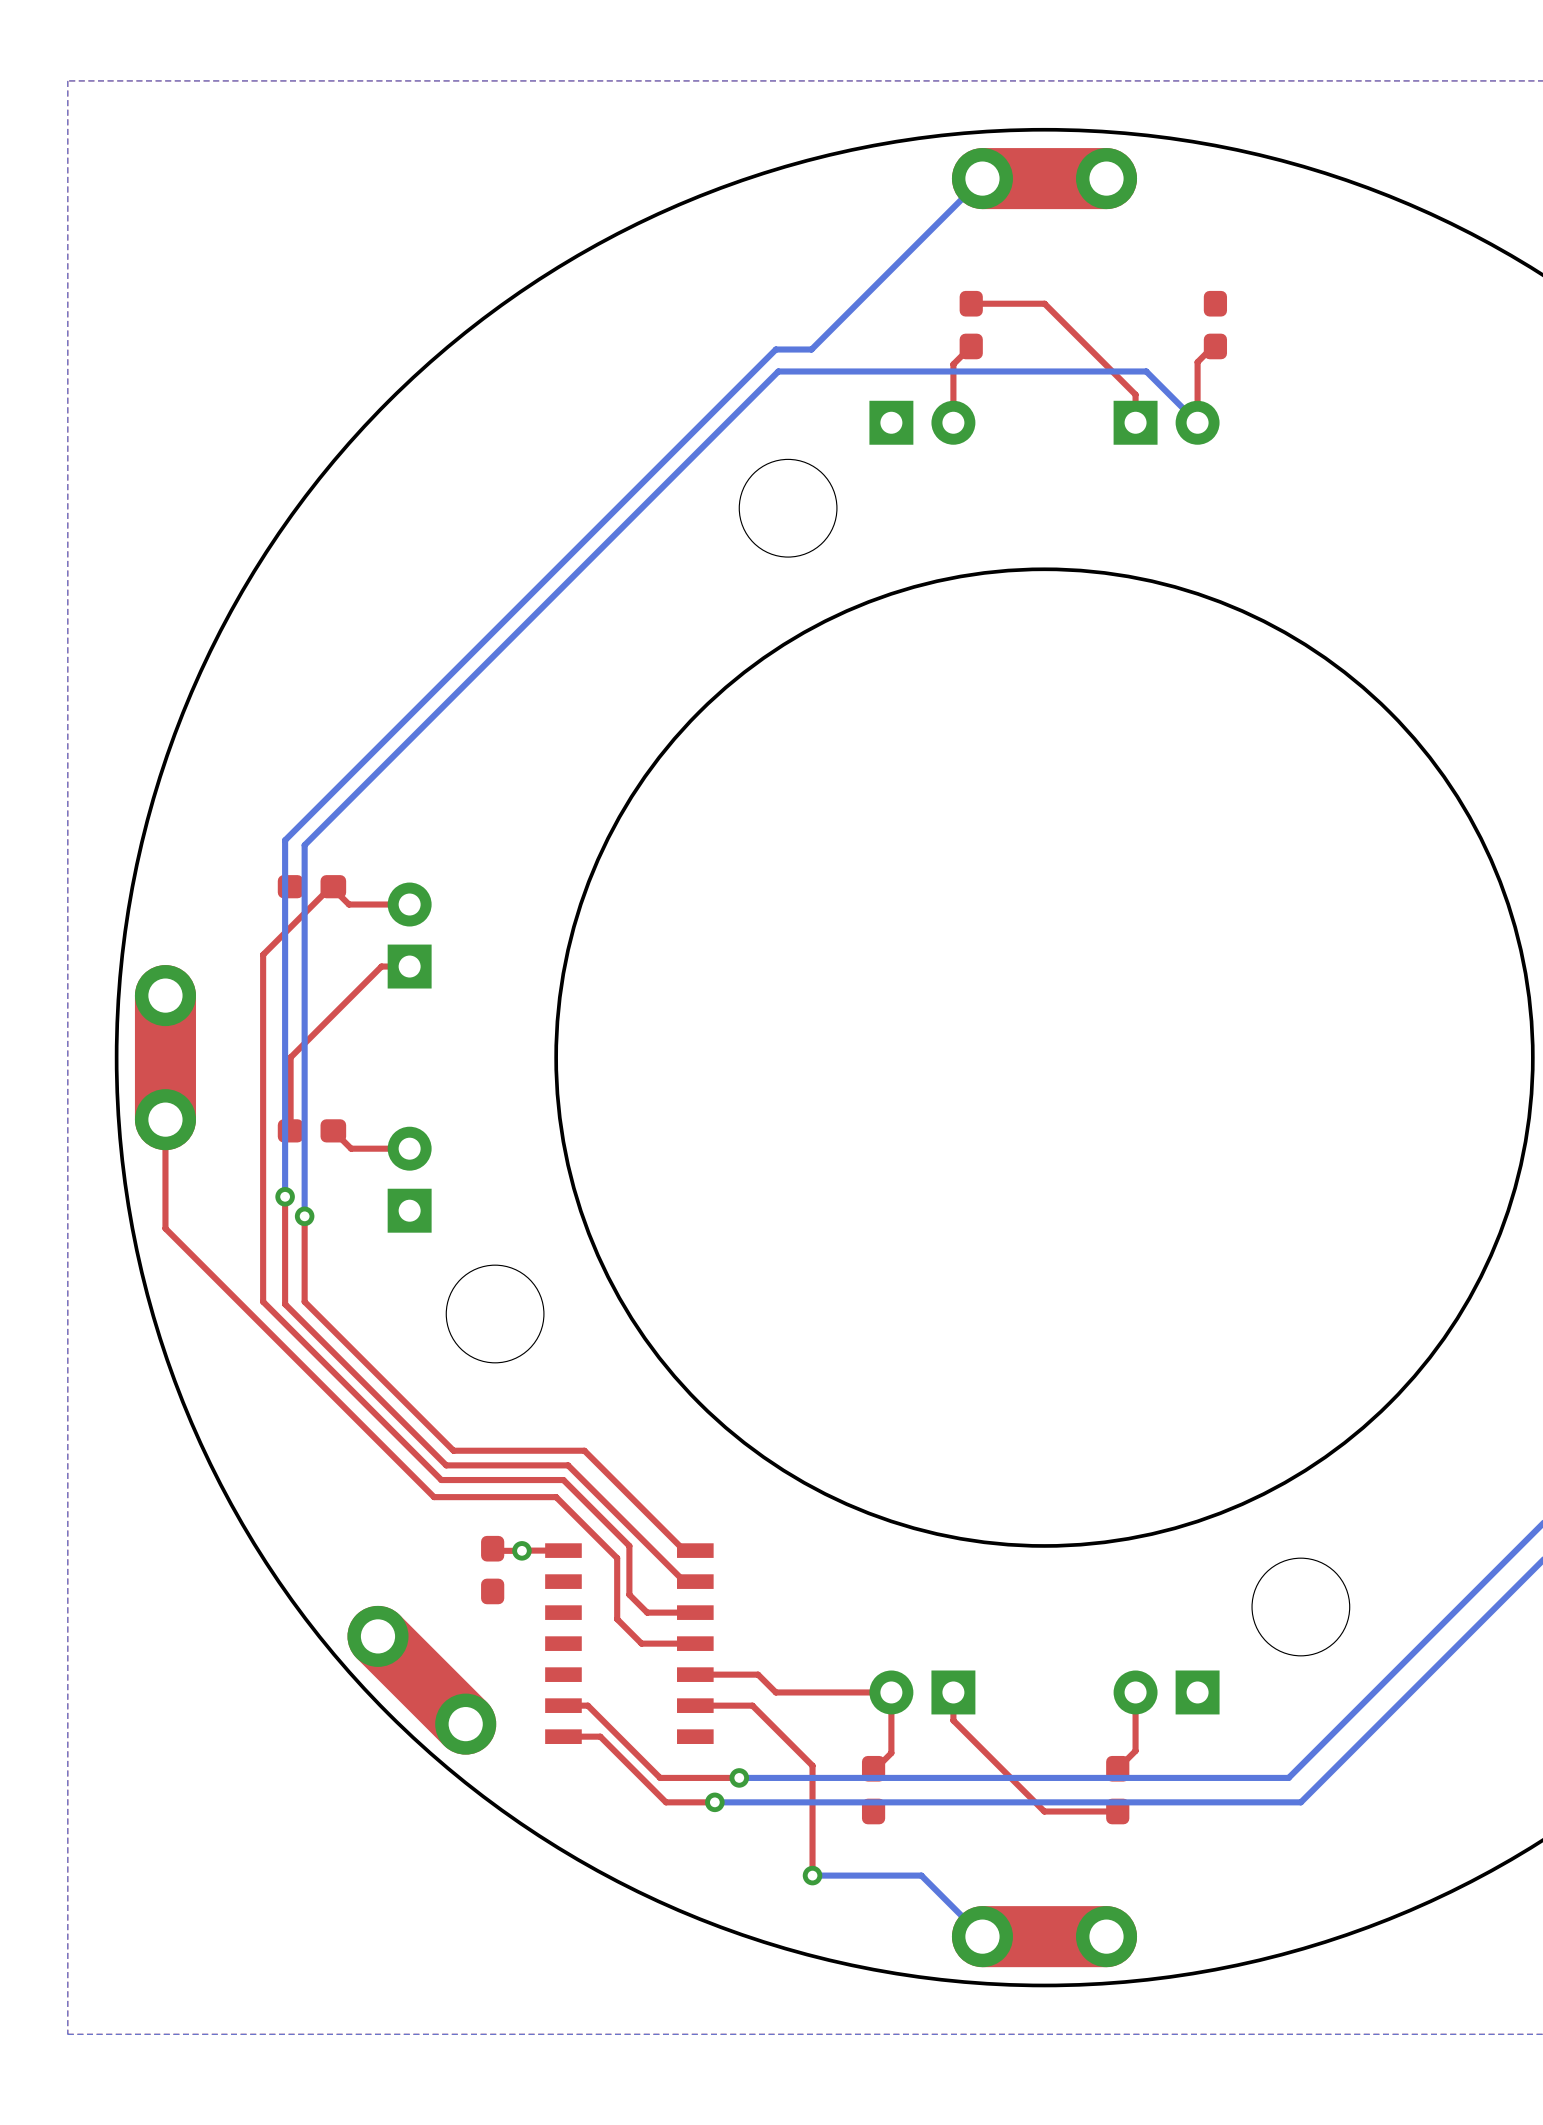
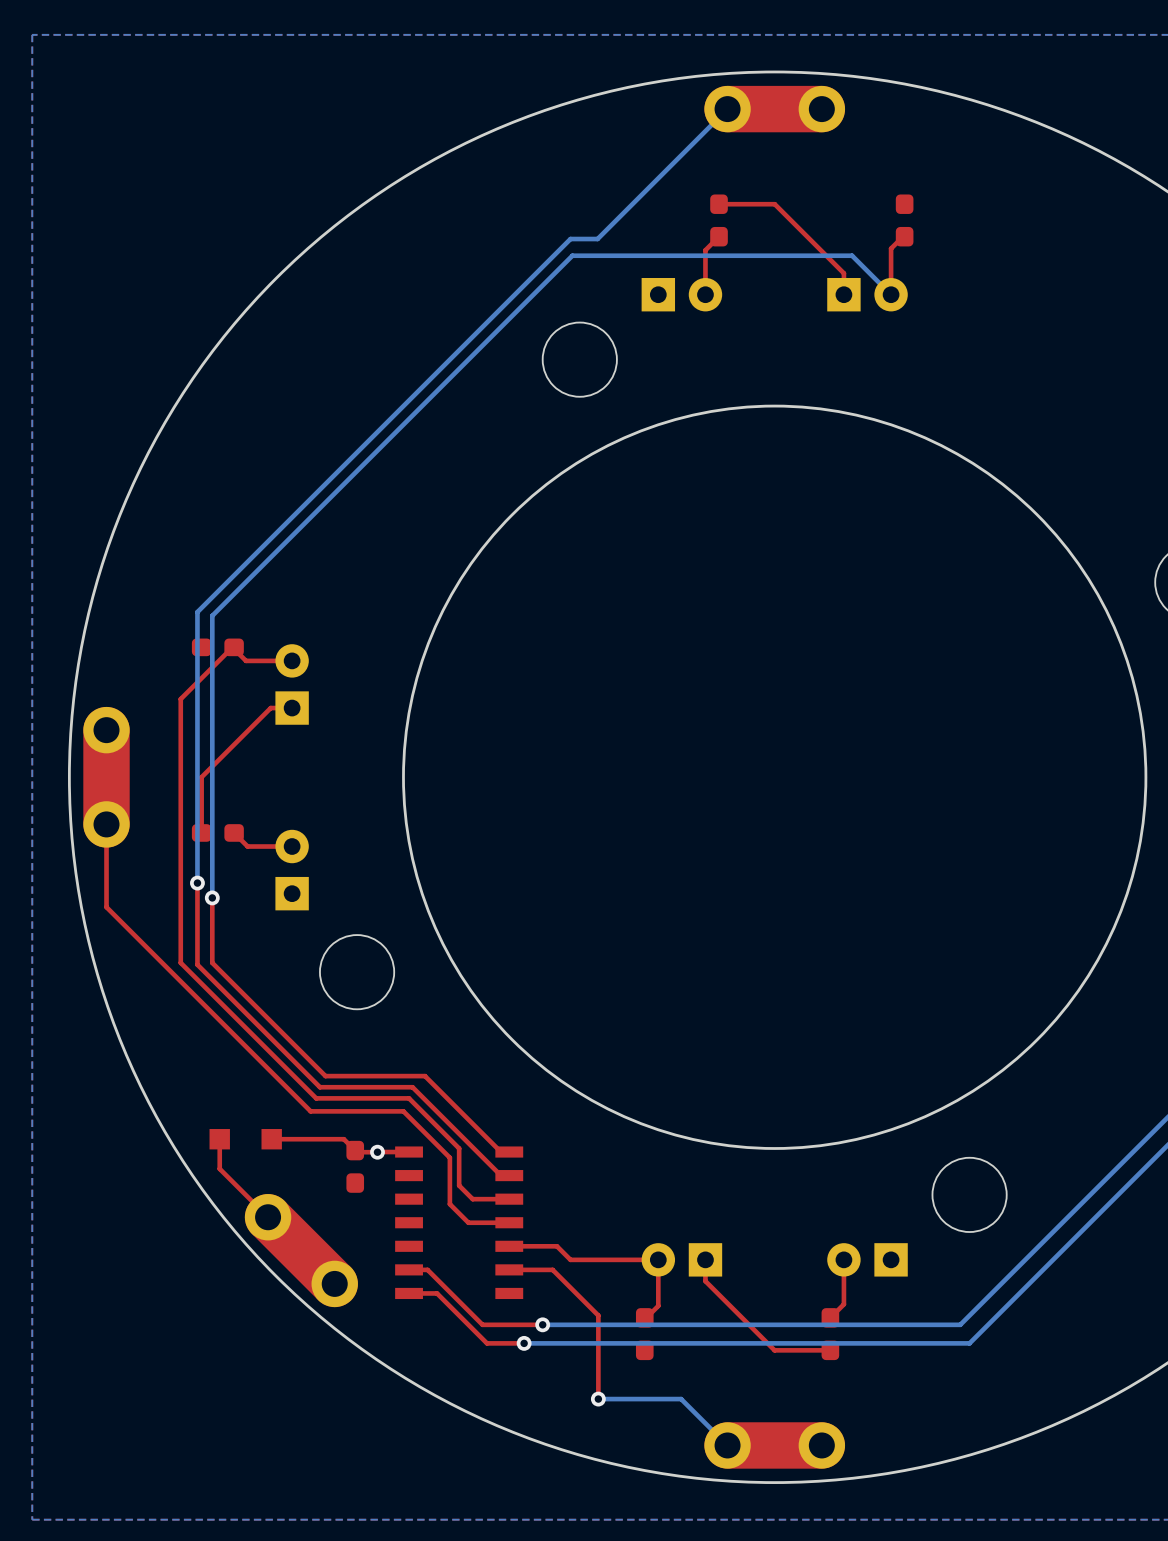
top track: none -> (219, 1139) (219, 1168) (268, 1217)
part: none -> (245, 1139)
top track: none -> (271, 1139) (343, 1139) (355, 1150)

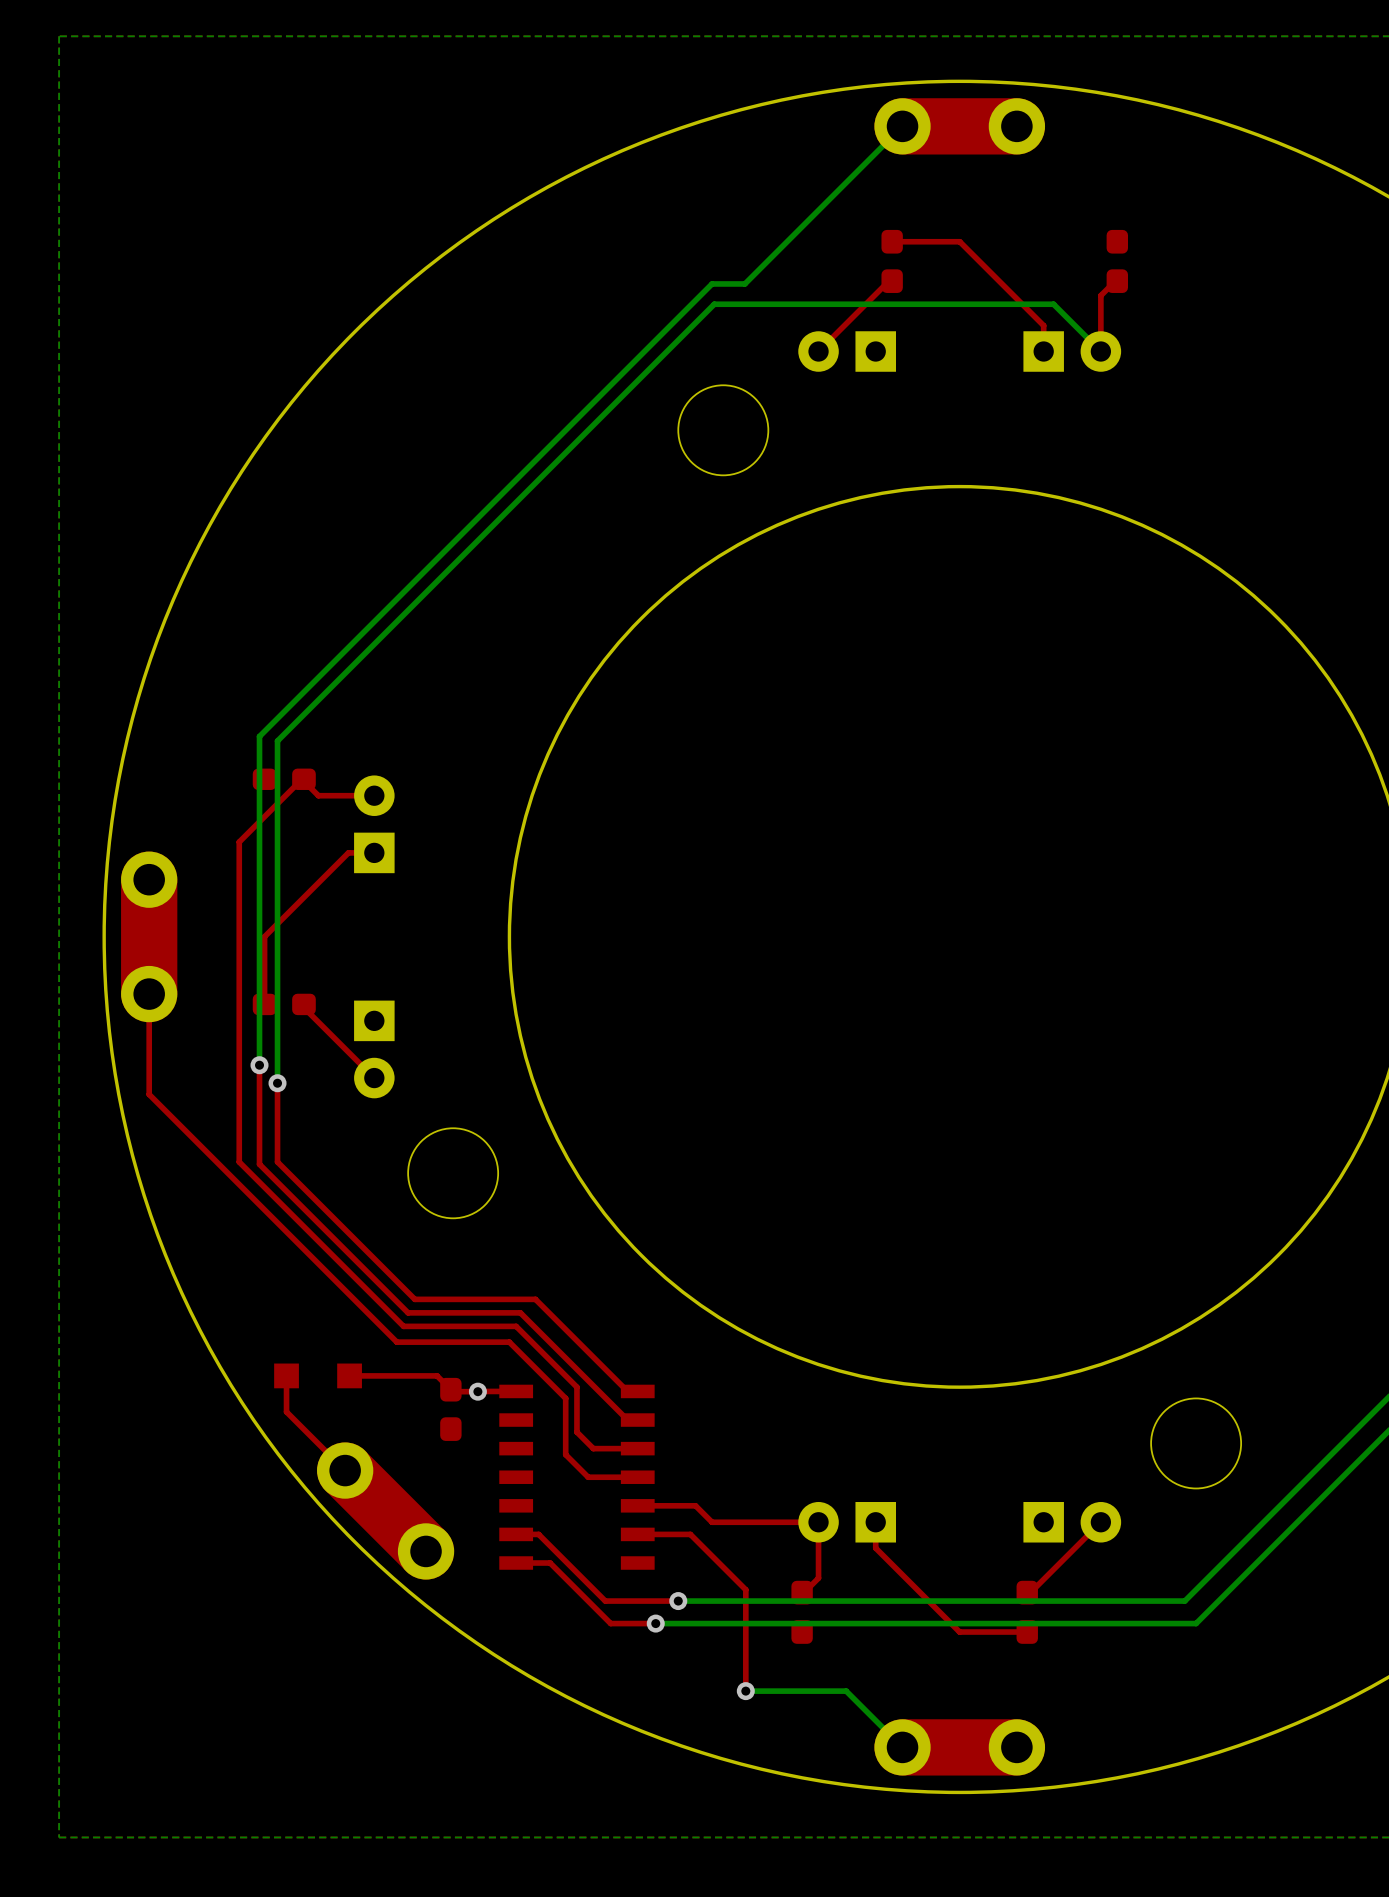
top track: (719, 236) (705, 250) (705, 294) -> (892, 281) (888, 281) (818, 351)
part rotation: 0° (681, 294) -> 180° (847, 351)
top track: (234, 832) (247, 846) (292, 846) -> (303, 1004) (303, 1007) (374, 1078)
part rotation: 0° (292, 870) -> 180° (374, 1049)
top track: (843, 1259) (843, 1304) (830, 1317) -> (1100, 1522) (1030, 1592) (1027, 1592)
part rotation: 0° (867, 1259) -> 180° (1072, 1522)

